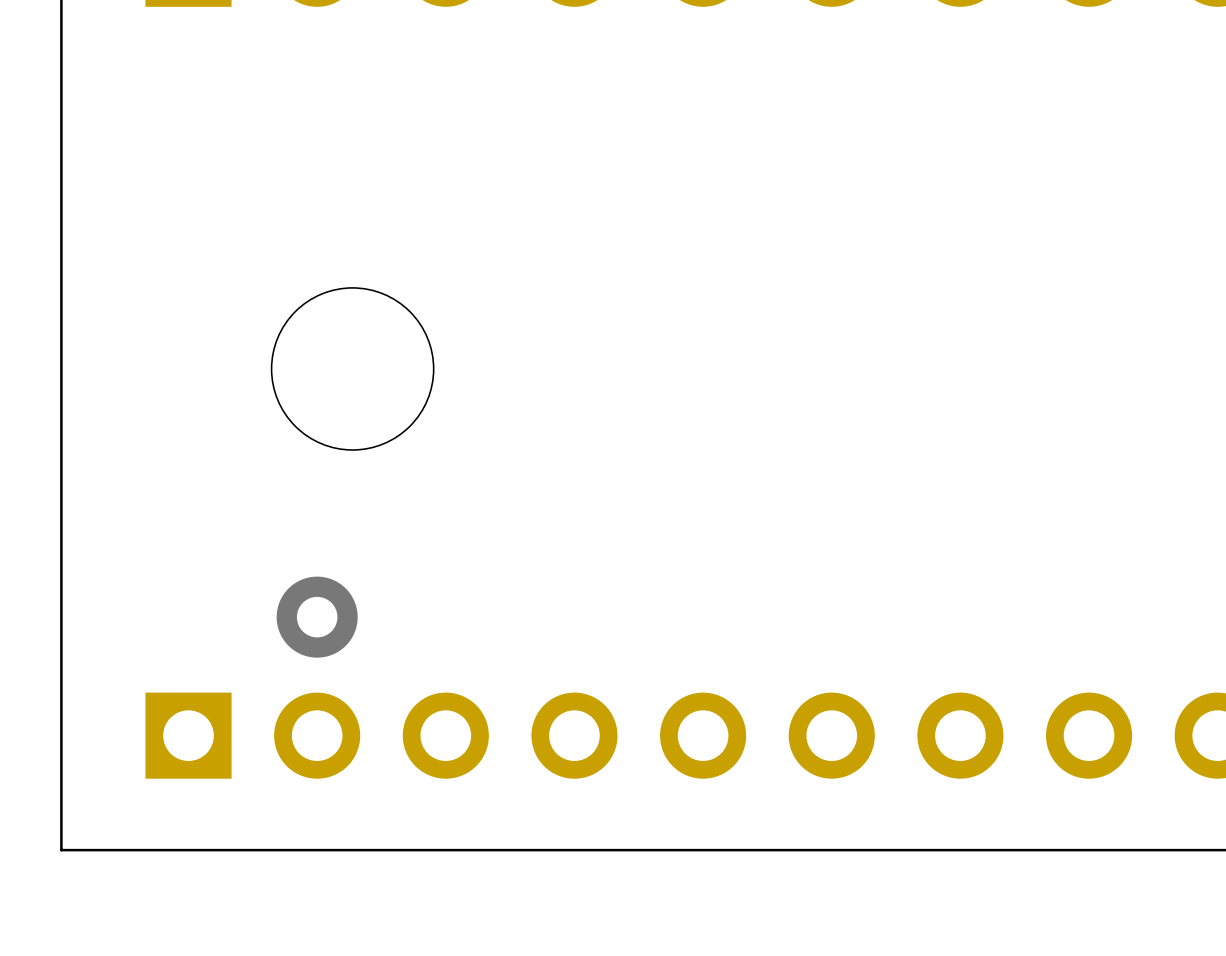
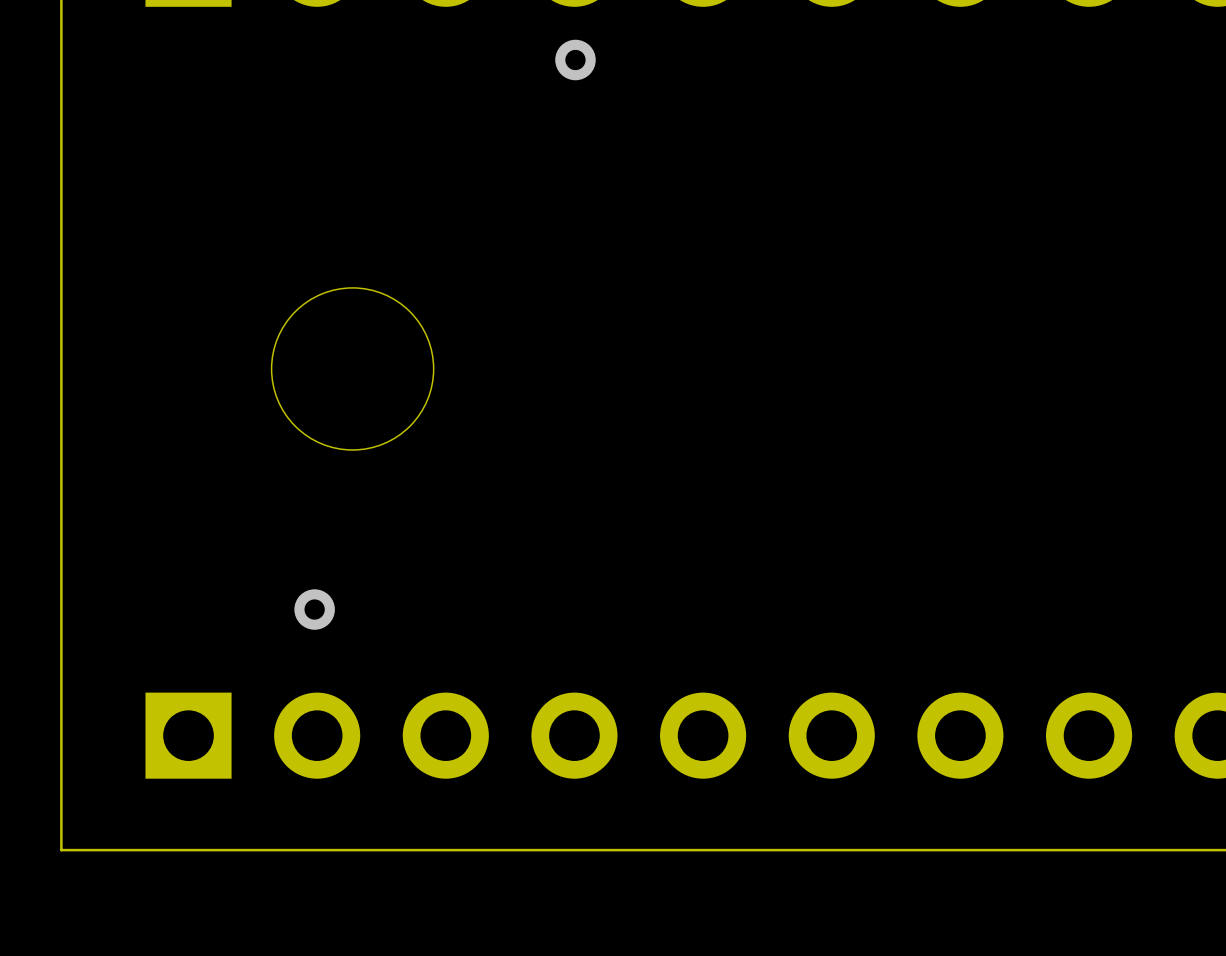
via: none -> (575, 60)
via size: [276, 576, 358, 658] -> [294, 589, 335, 630]

